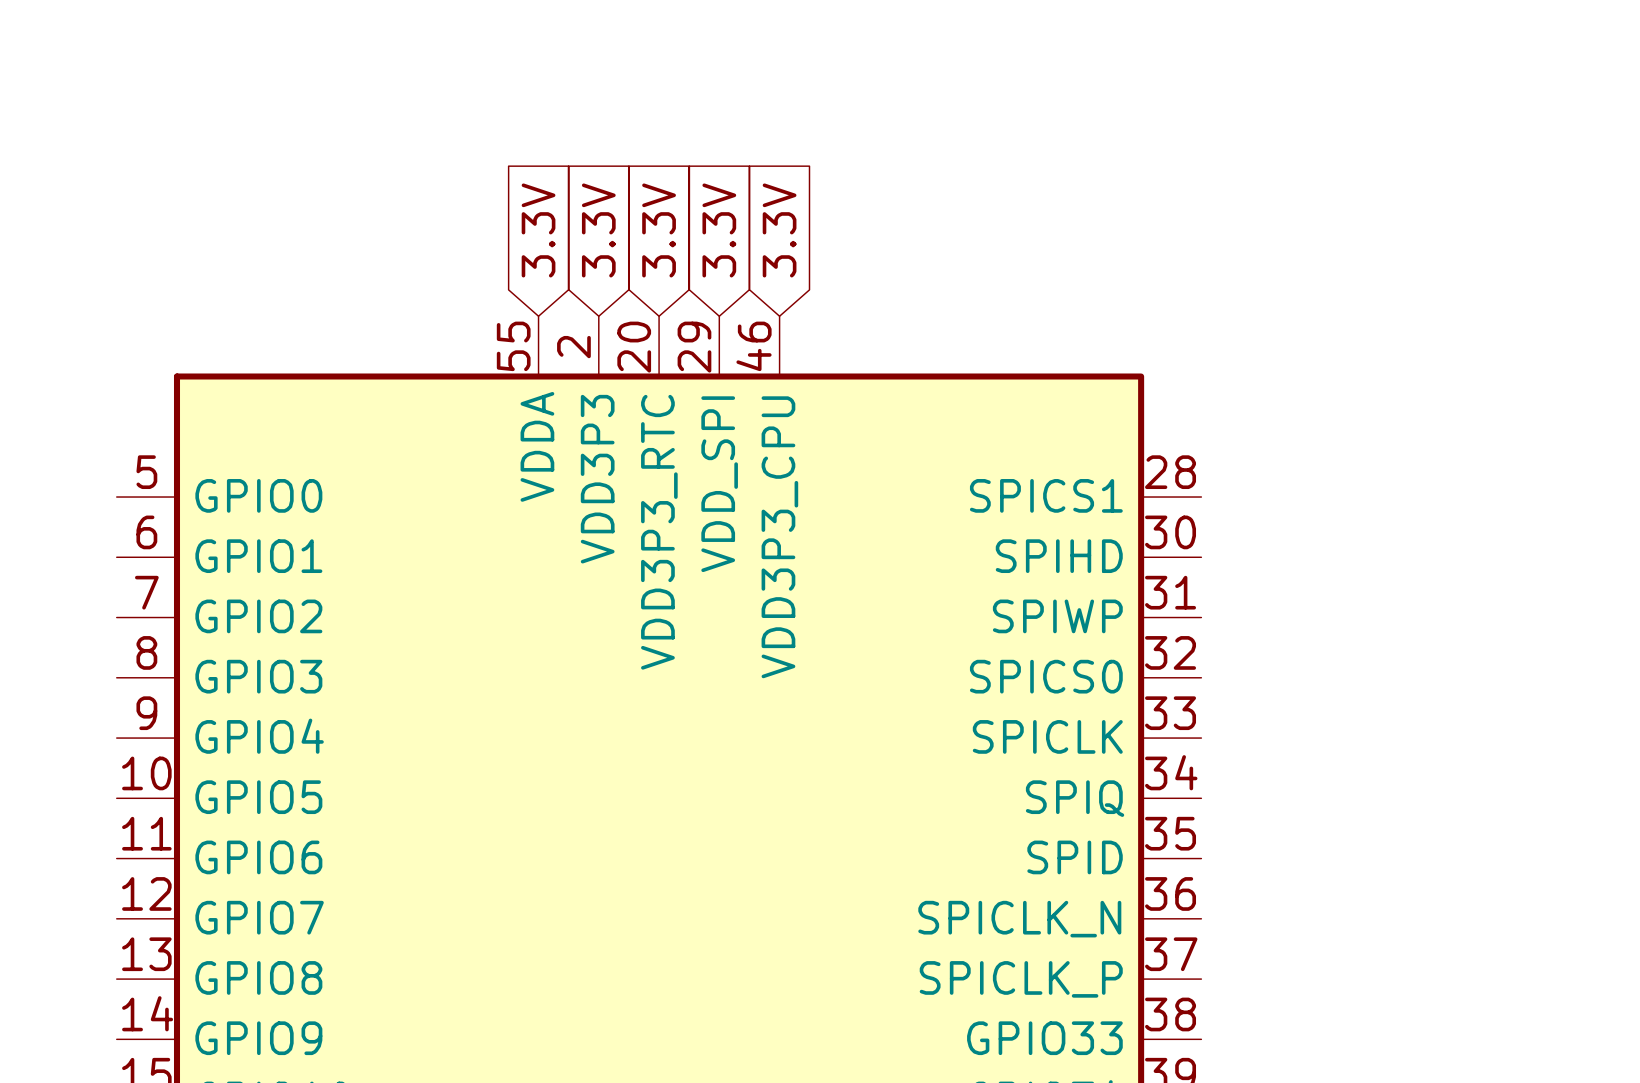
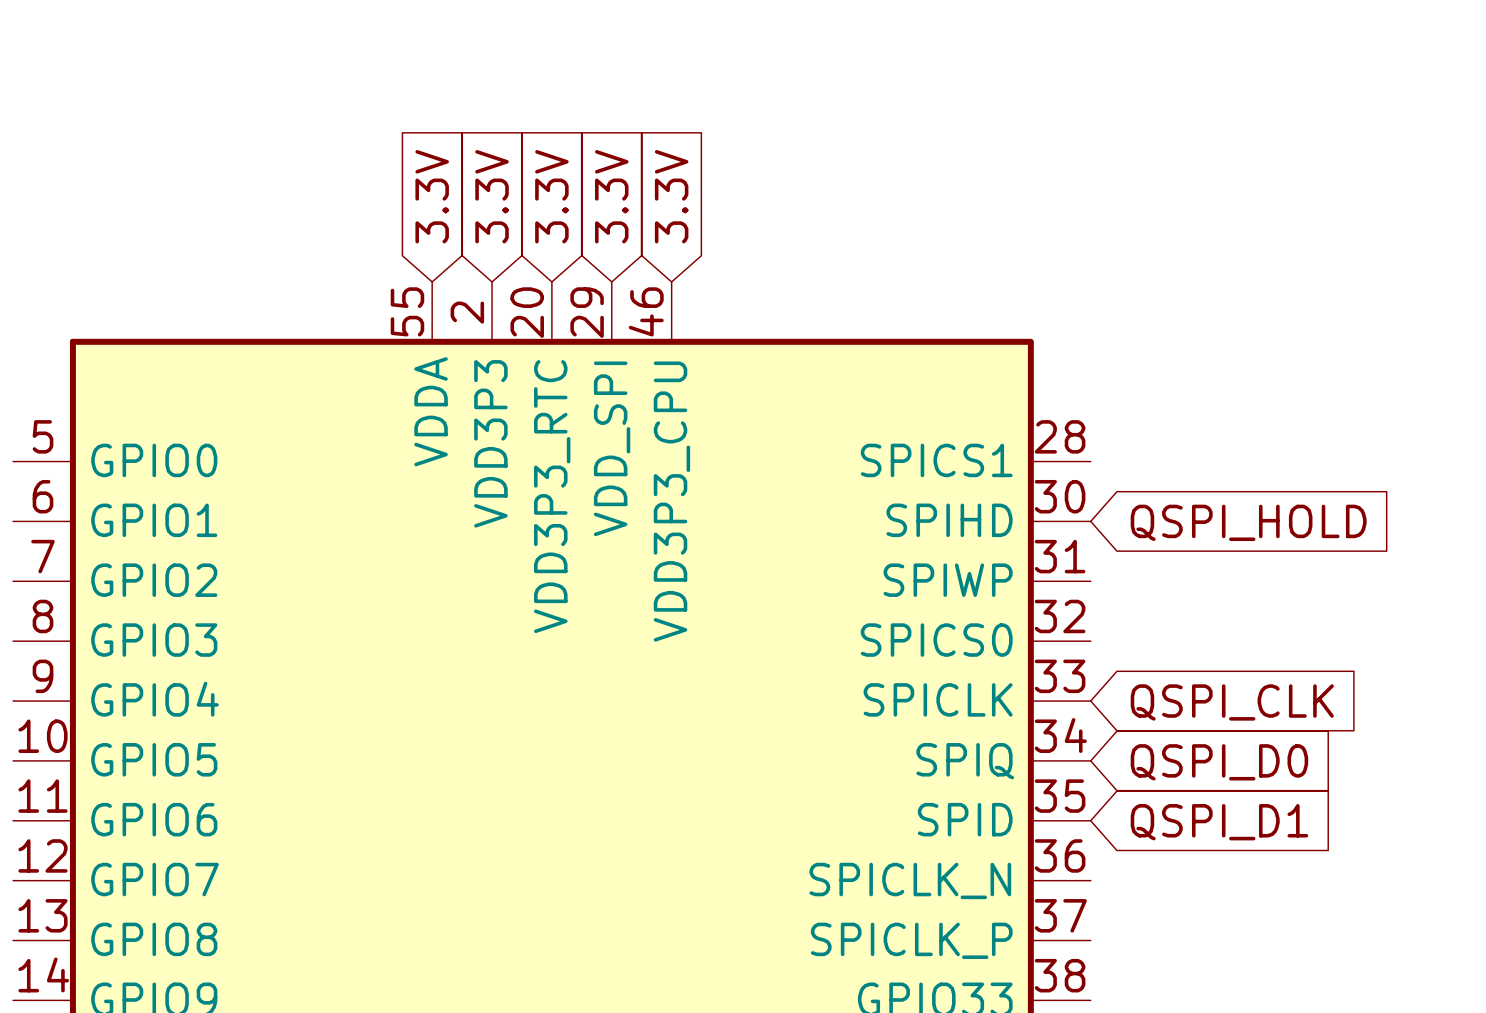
global label: none -> QSPI_HOLD (1248, 522)
global label: none -> QSPI_CLK (1232, 702)
global label: none -> QSPI_D0 (1219, 762)
global label: none -> QSPI_D1 (1219, 822)

